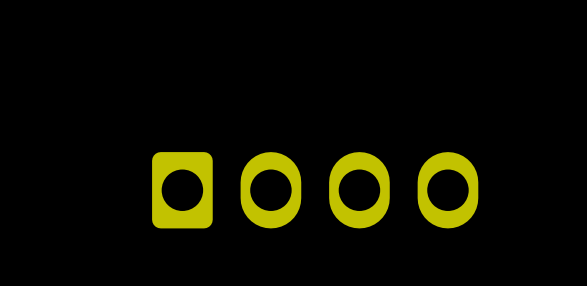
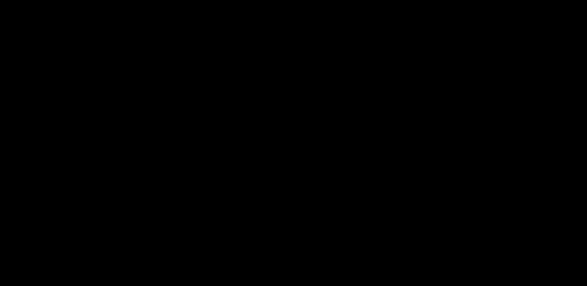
part: (315, 190) -> none

